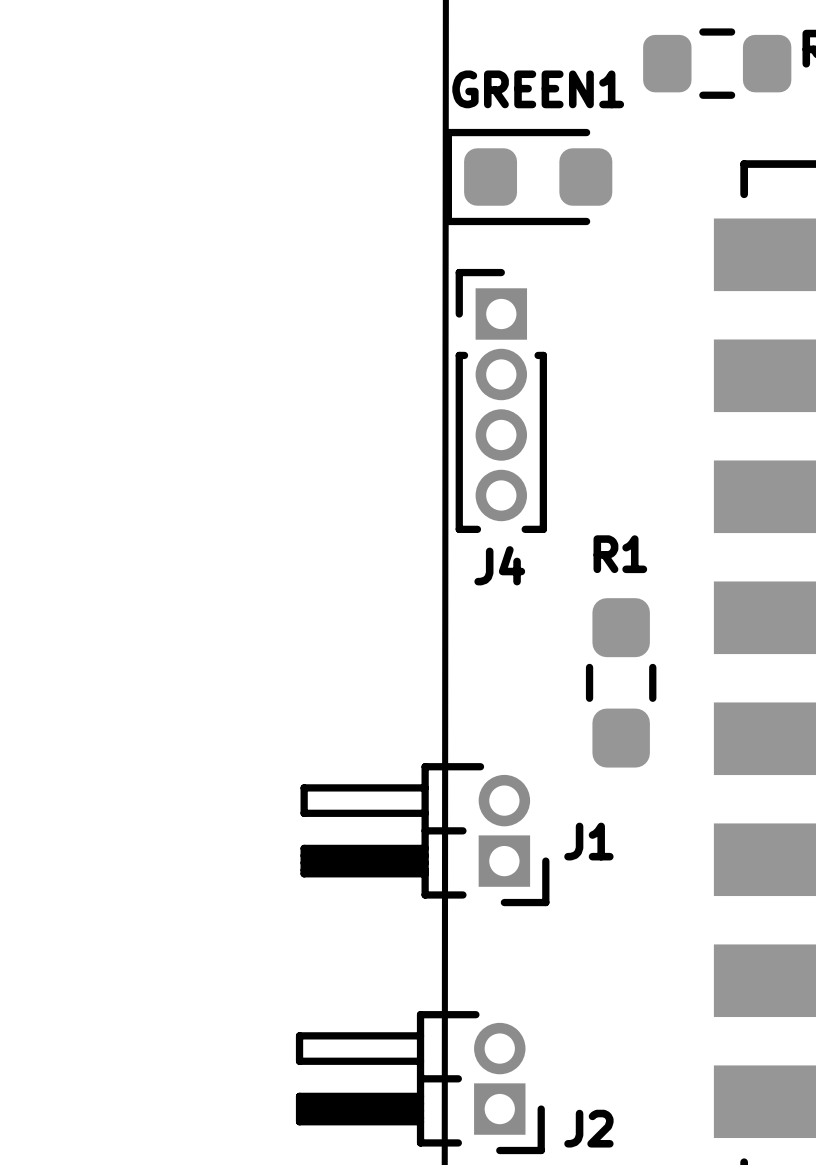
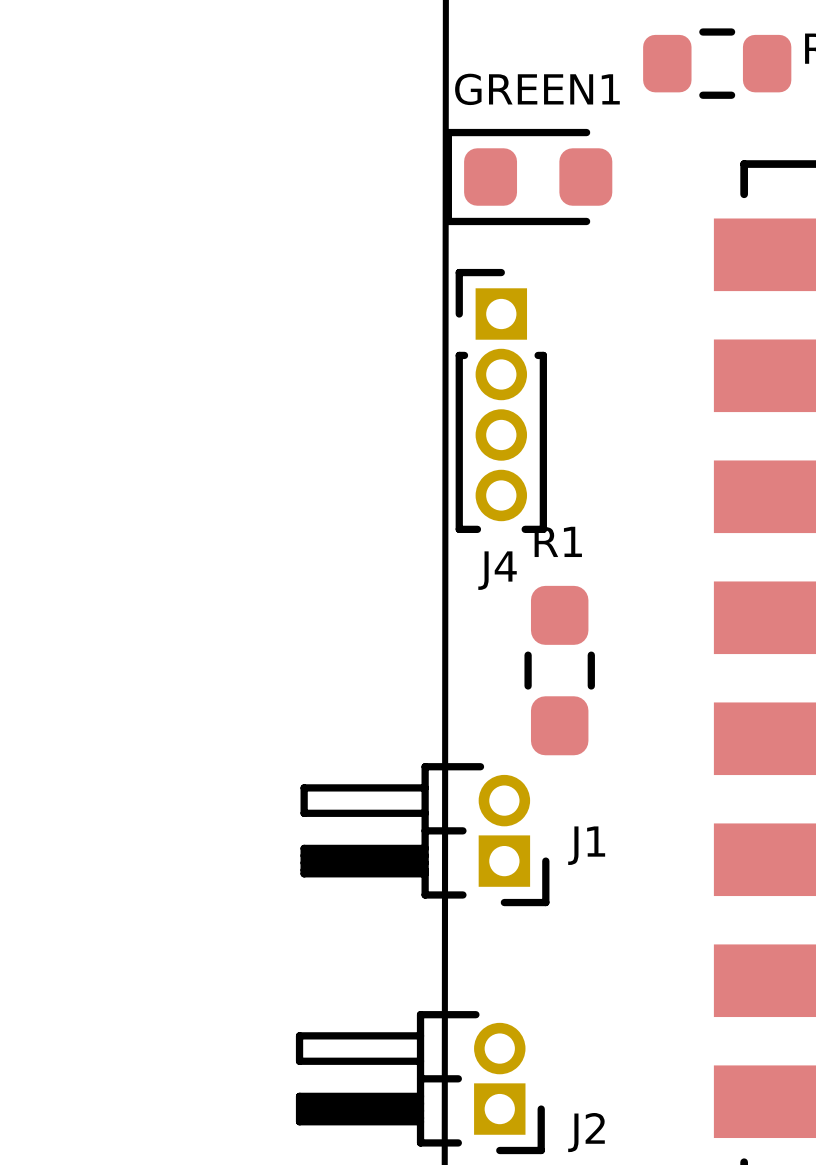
R1 position: (621, 682) -> (559, 670)

